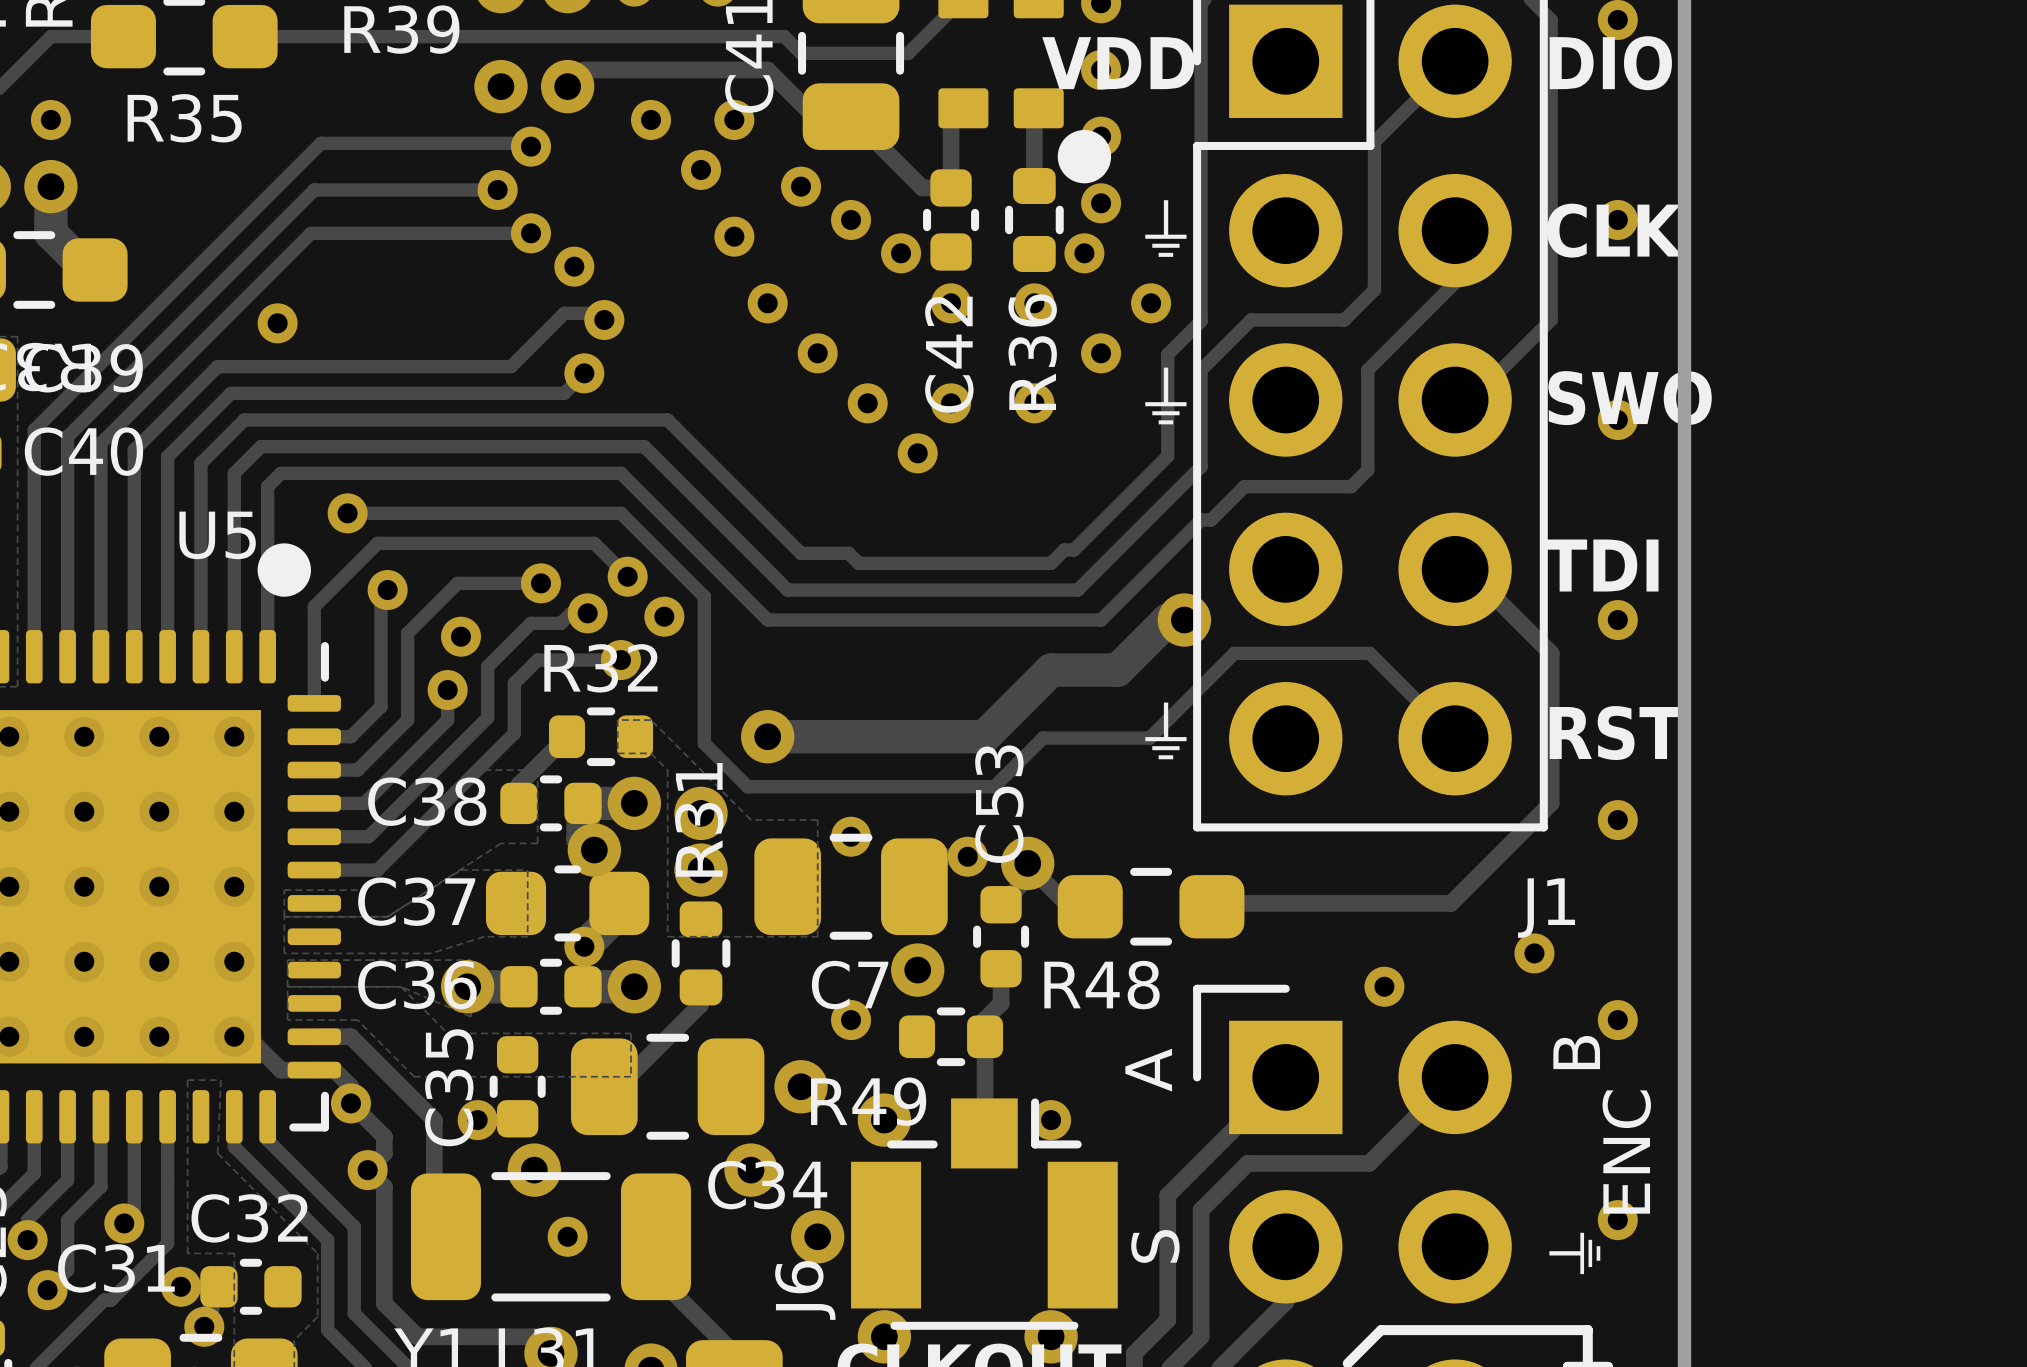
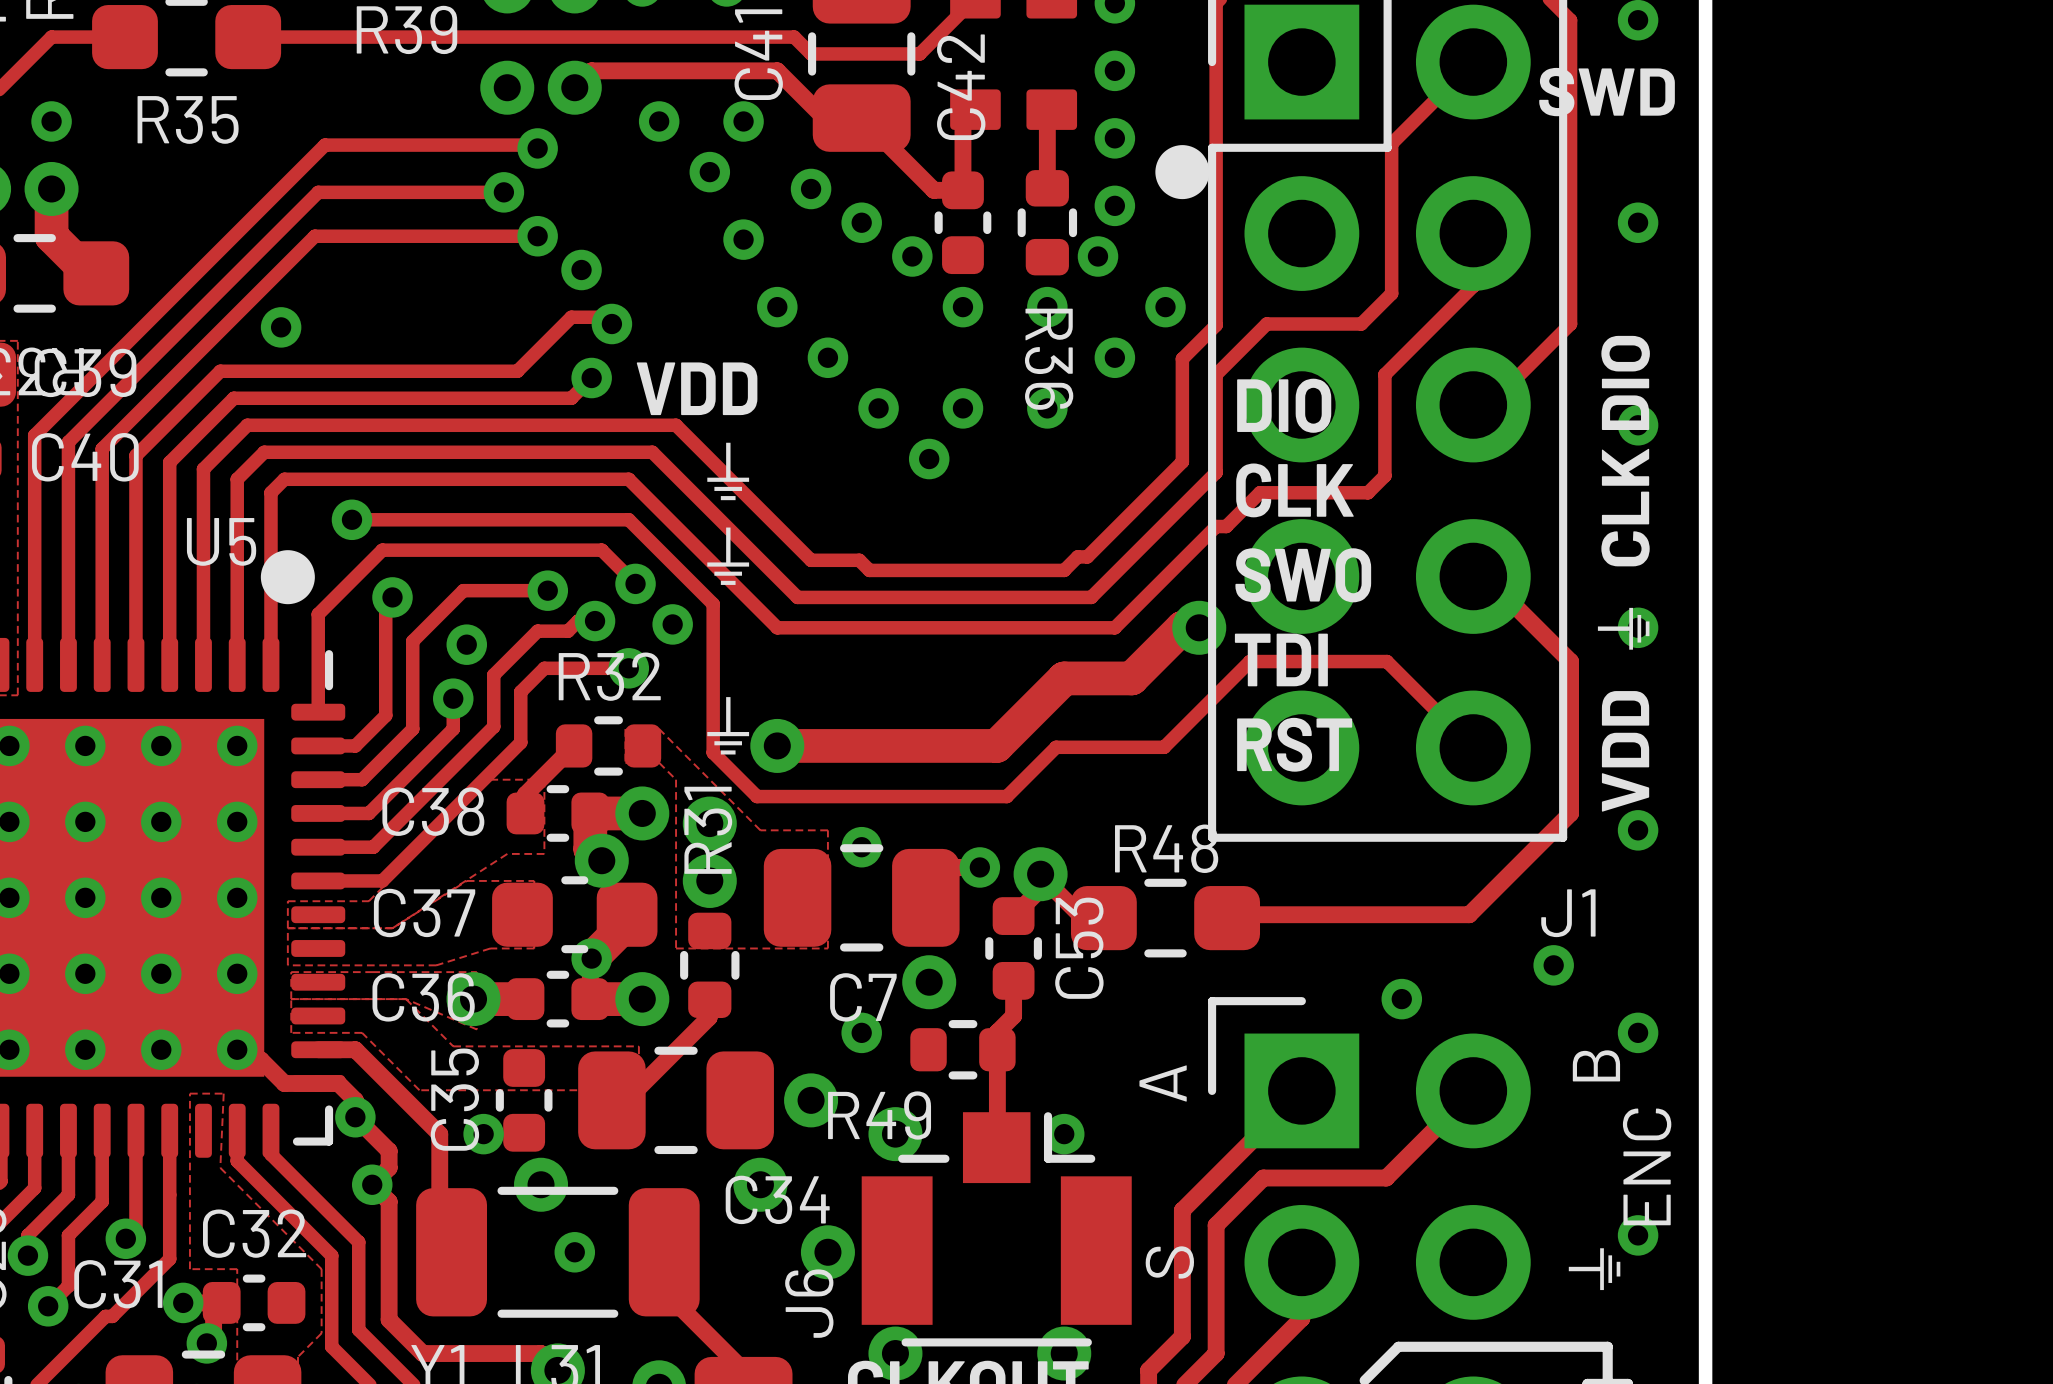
text position: VDD (1118, 63) -> VDD (697, 388)
text position: DIO (1610, 63) -> DIO (1284, 405)
text: none -> SWD (1607, 92)
drawing position: (1084, 156) -> (1182, 172)
text: ⏚ (1165, 228) -> none
text position: CLK (1615, 230) -> CLK (1294, 490)
R36 name rotation: 0° (1032, 352) -> 180° (1049, 359)
C42 name position: C42 (949, 354) -> C42 (961, 87)
text: ⏚ (1165, 396) -> none
text position: SWO (1630, 398) -> SWO (1303, 575)
text: none -> ⏚ (728, 471)
text: none -> VDD ⏚ CLK DIO (1623, 573)
text: none -> ⏚ (728, 556)
text position: TDI (1601, 565) -> TDI (1281, 659)
text: none -> ⏚ (728, 725)
text: ⏚ (1165, 730) -> none
text position: RST (1616, 733) -> RST (1294, 744)
C53 name position: C53 (999, 804) -> C53 (1079, 948)
R48 name position: R48 (1102, 985) -> R48 (1166, 848)

